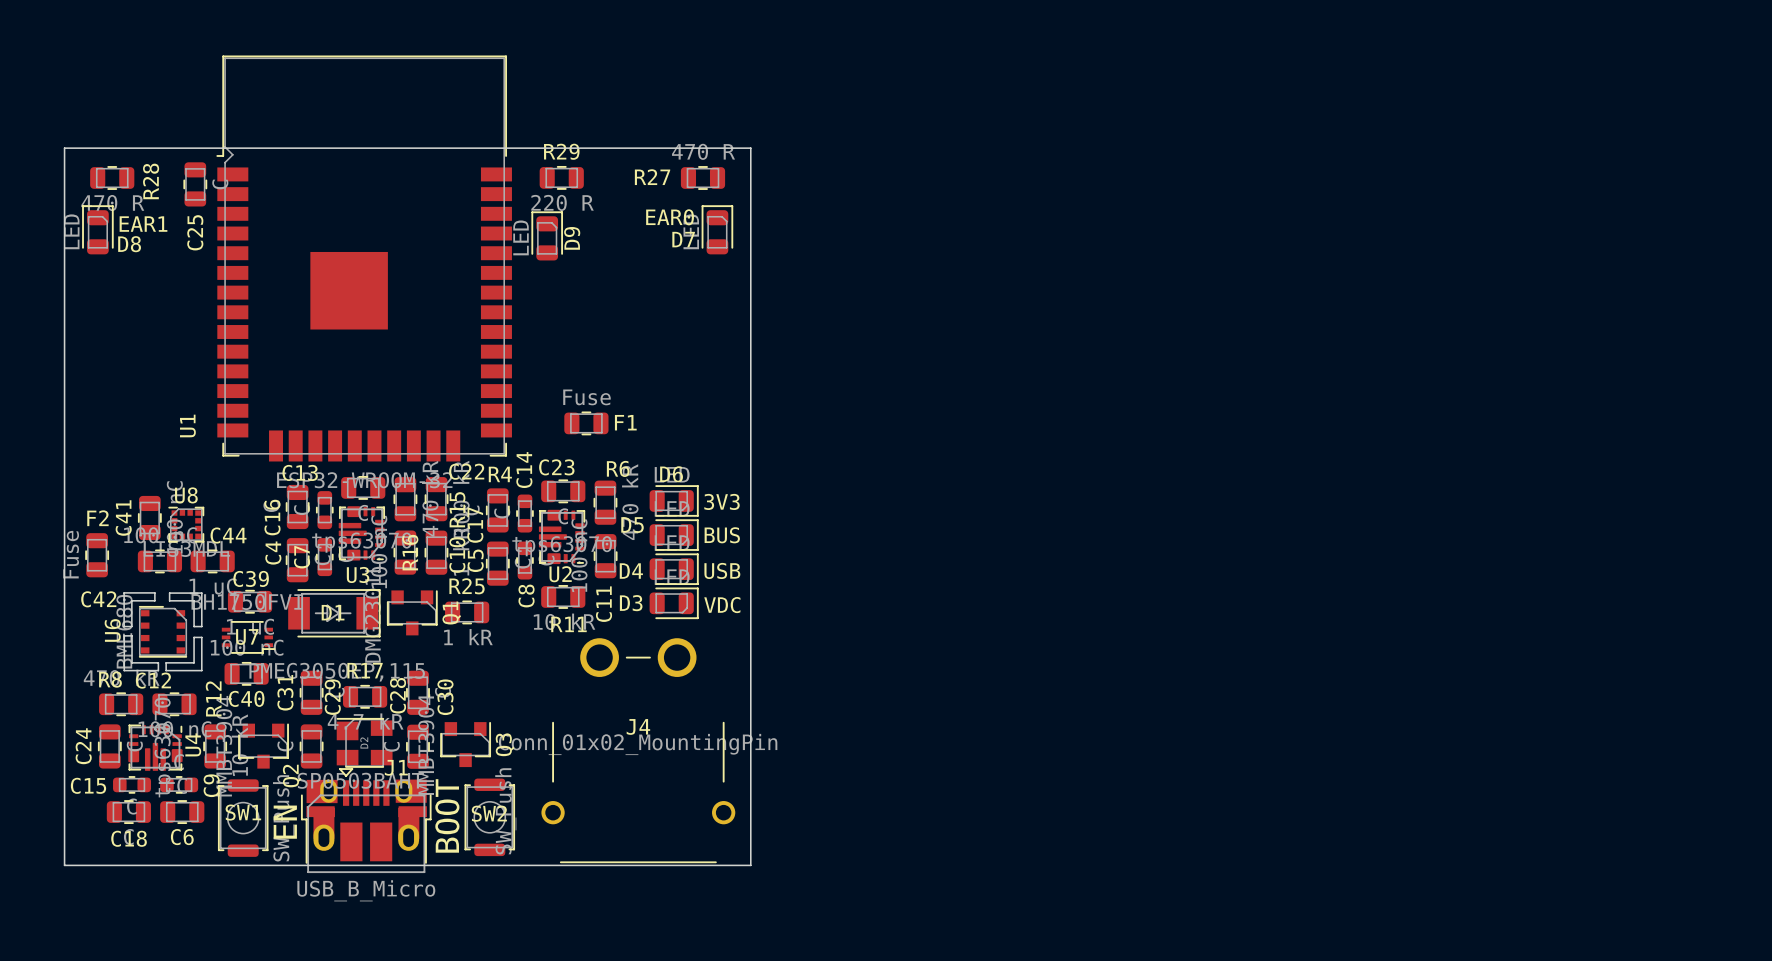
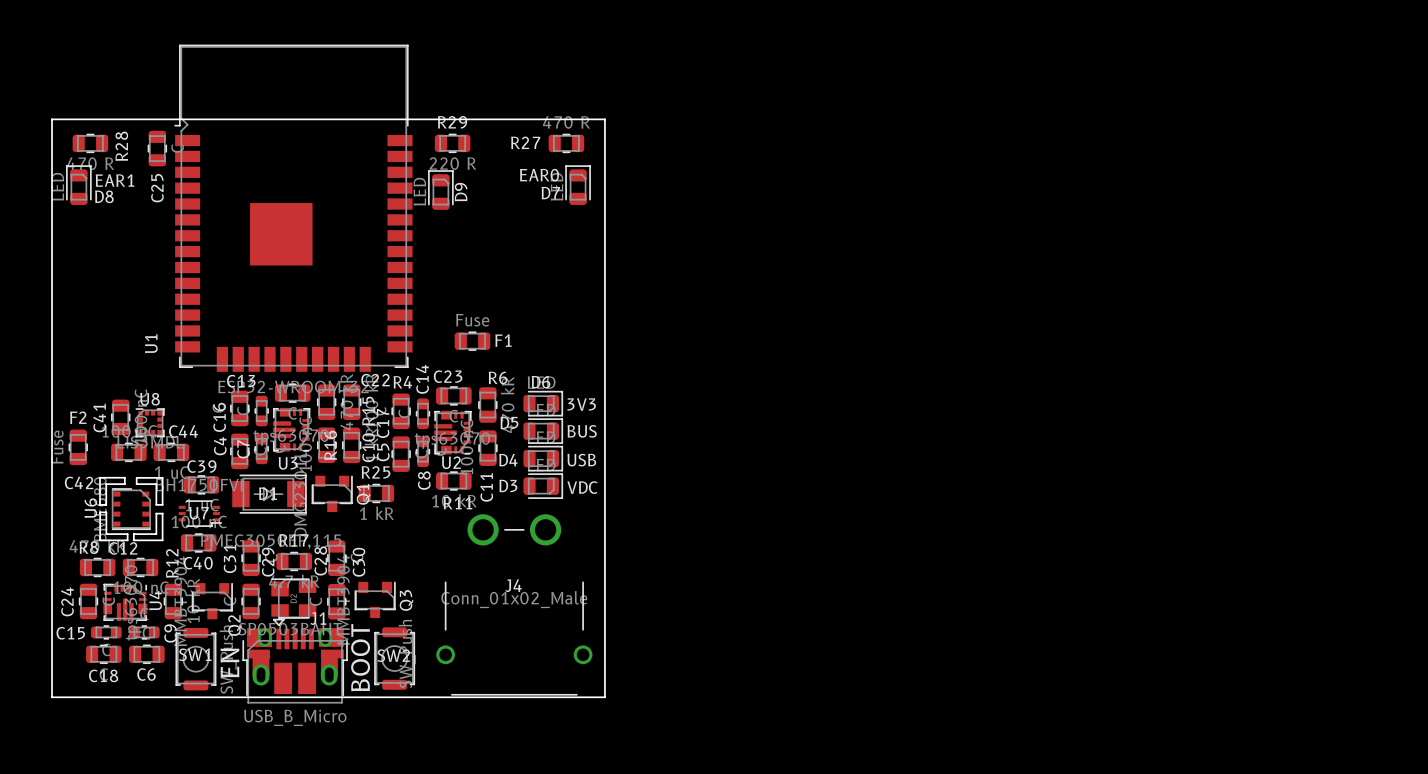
J4 value: Conn_01x02_MountingPin (638, 744) -> Conn_01x02_Male (514, 599)

